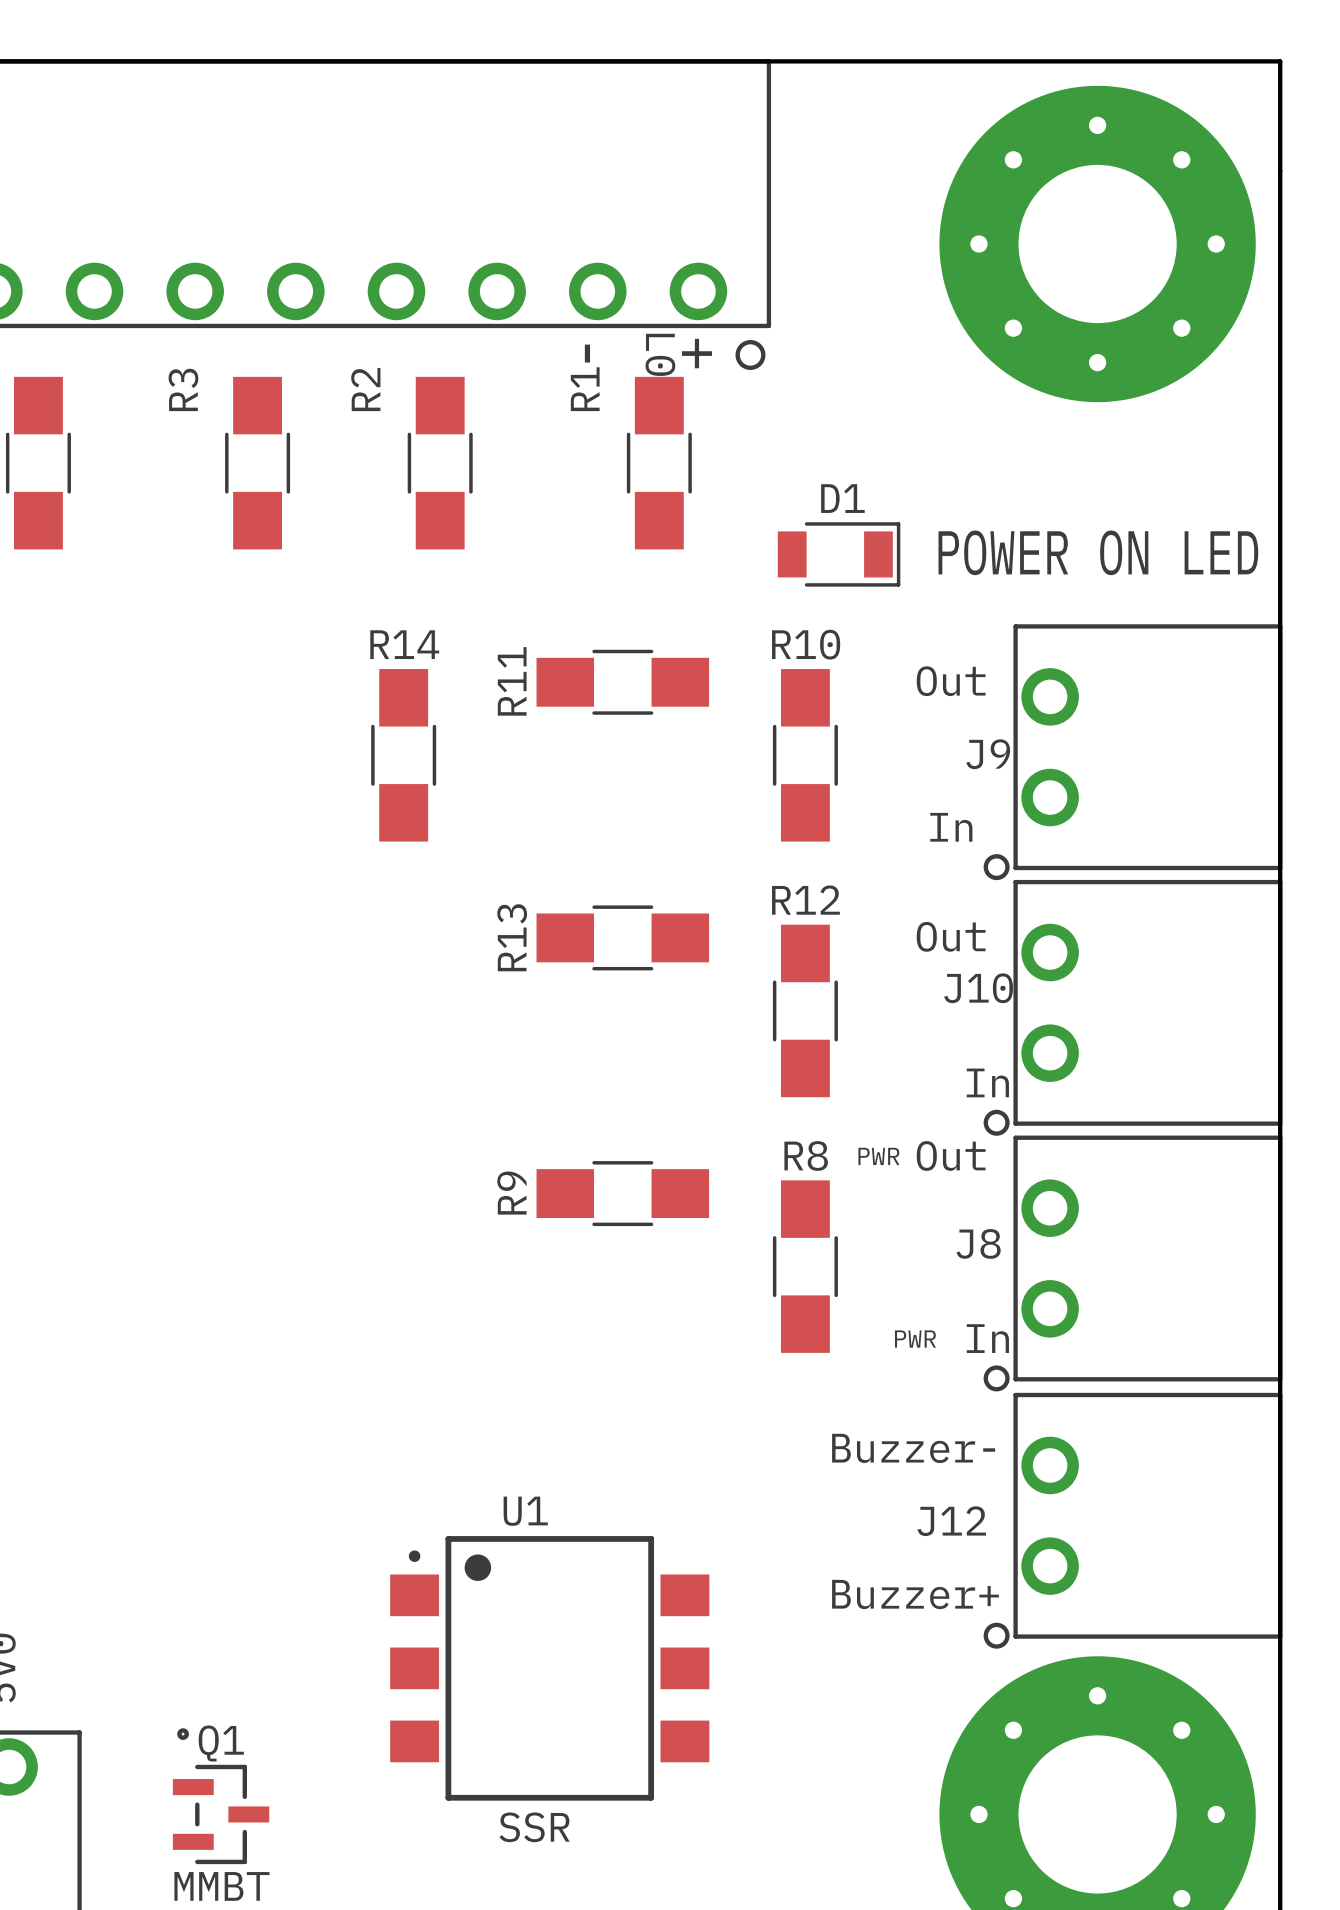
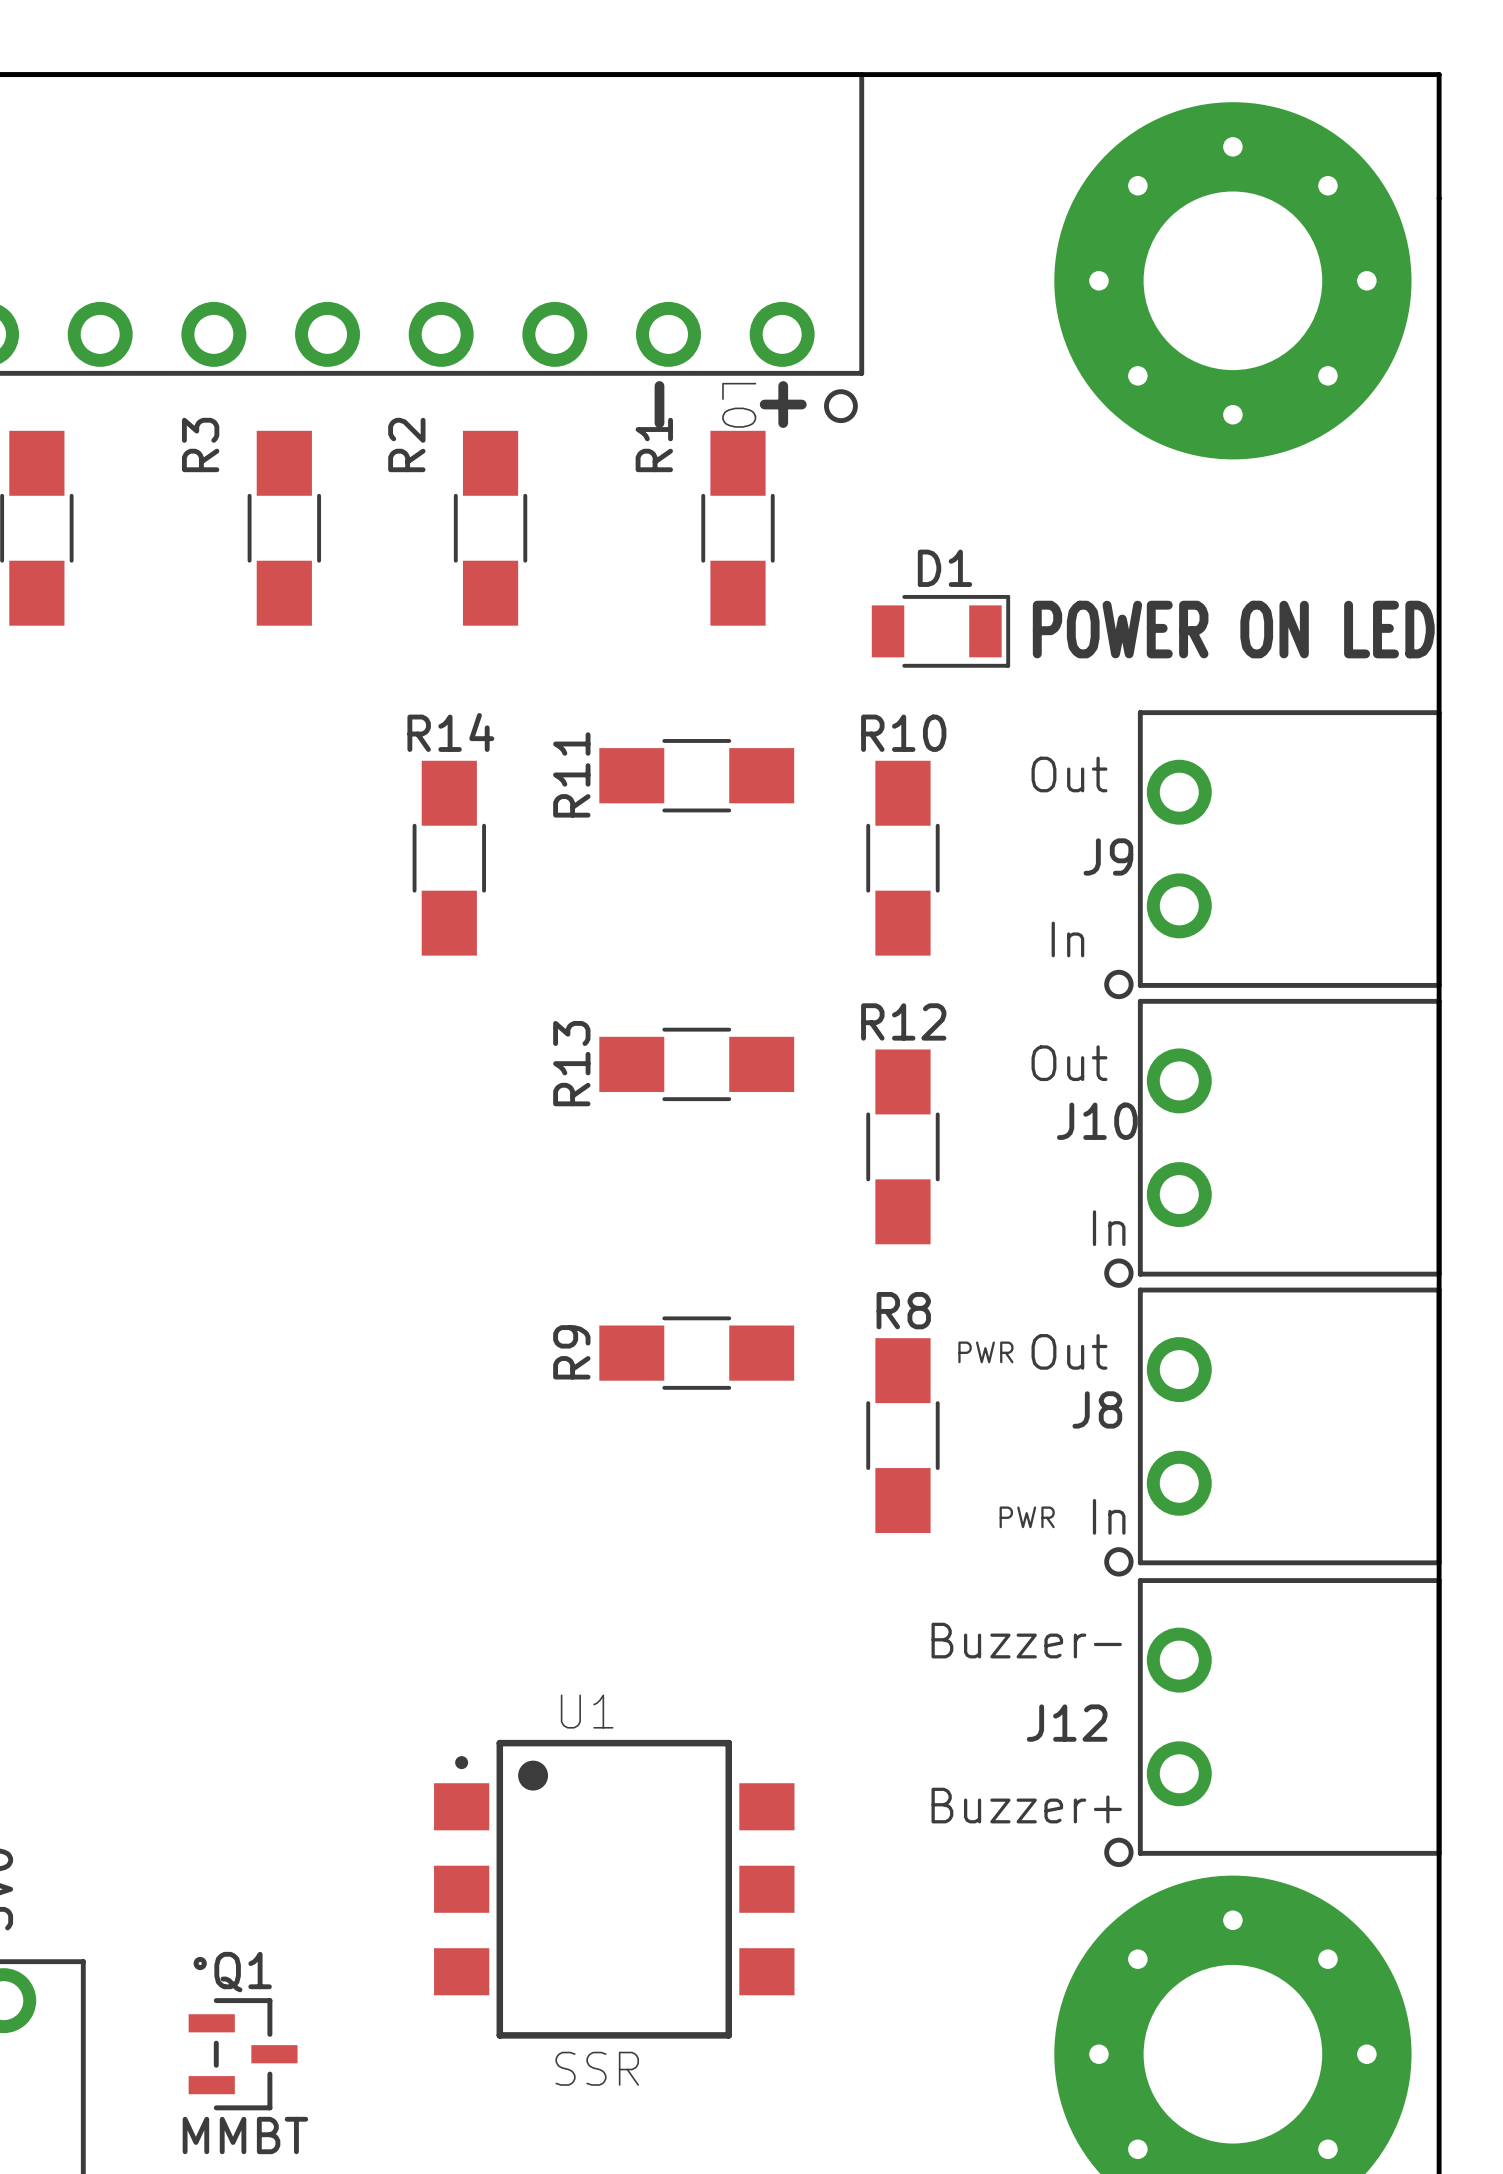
text position: Out (951, 1155) -> Out (1069, 1351)
text position: PWR (878, 1156) -> PWR (985, 1352)

